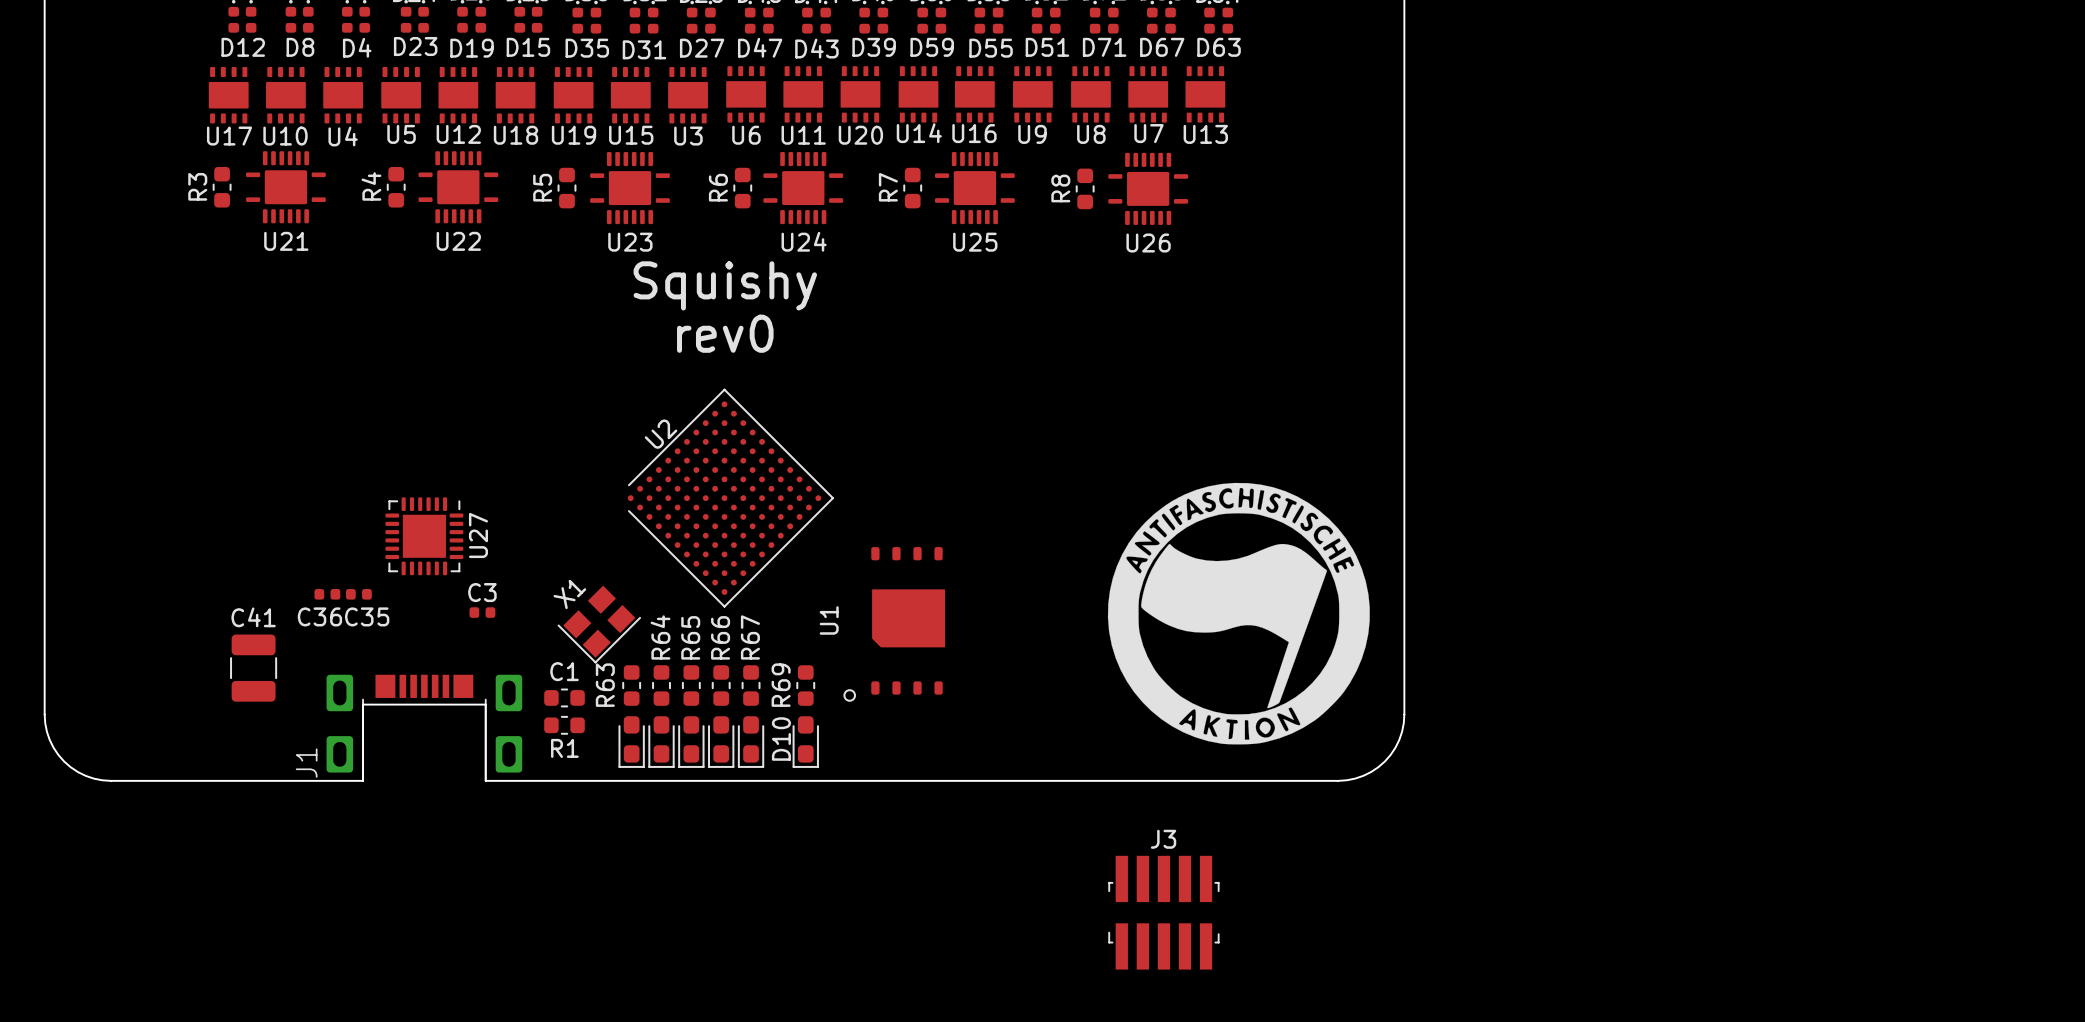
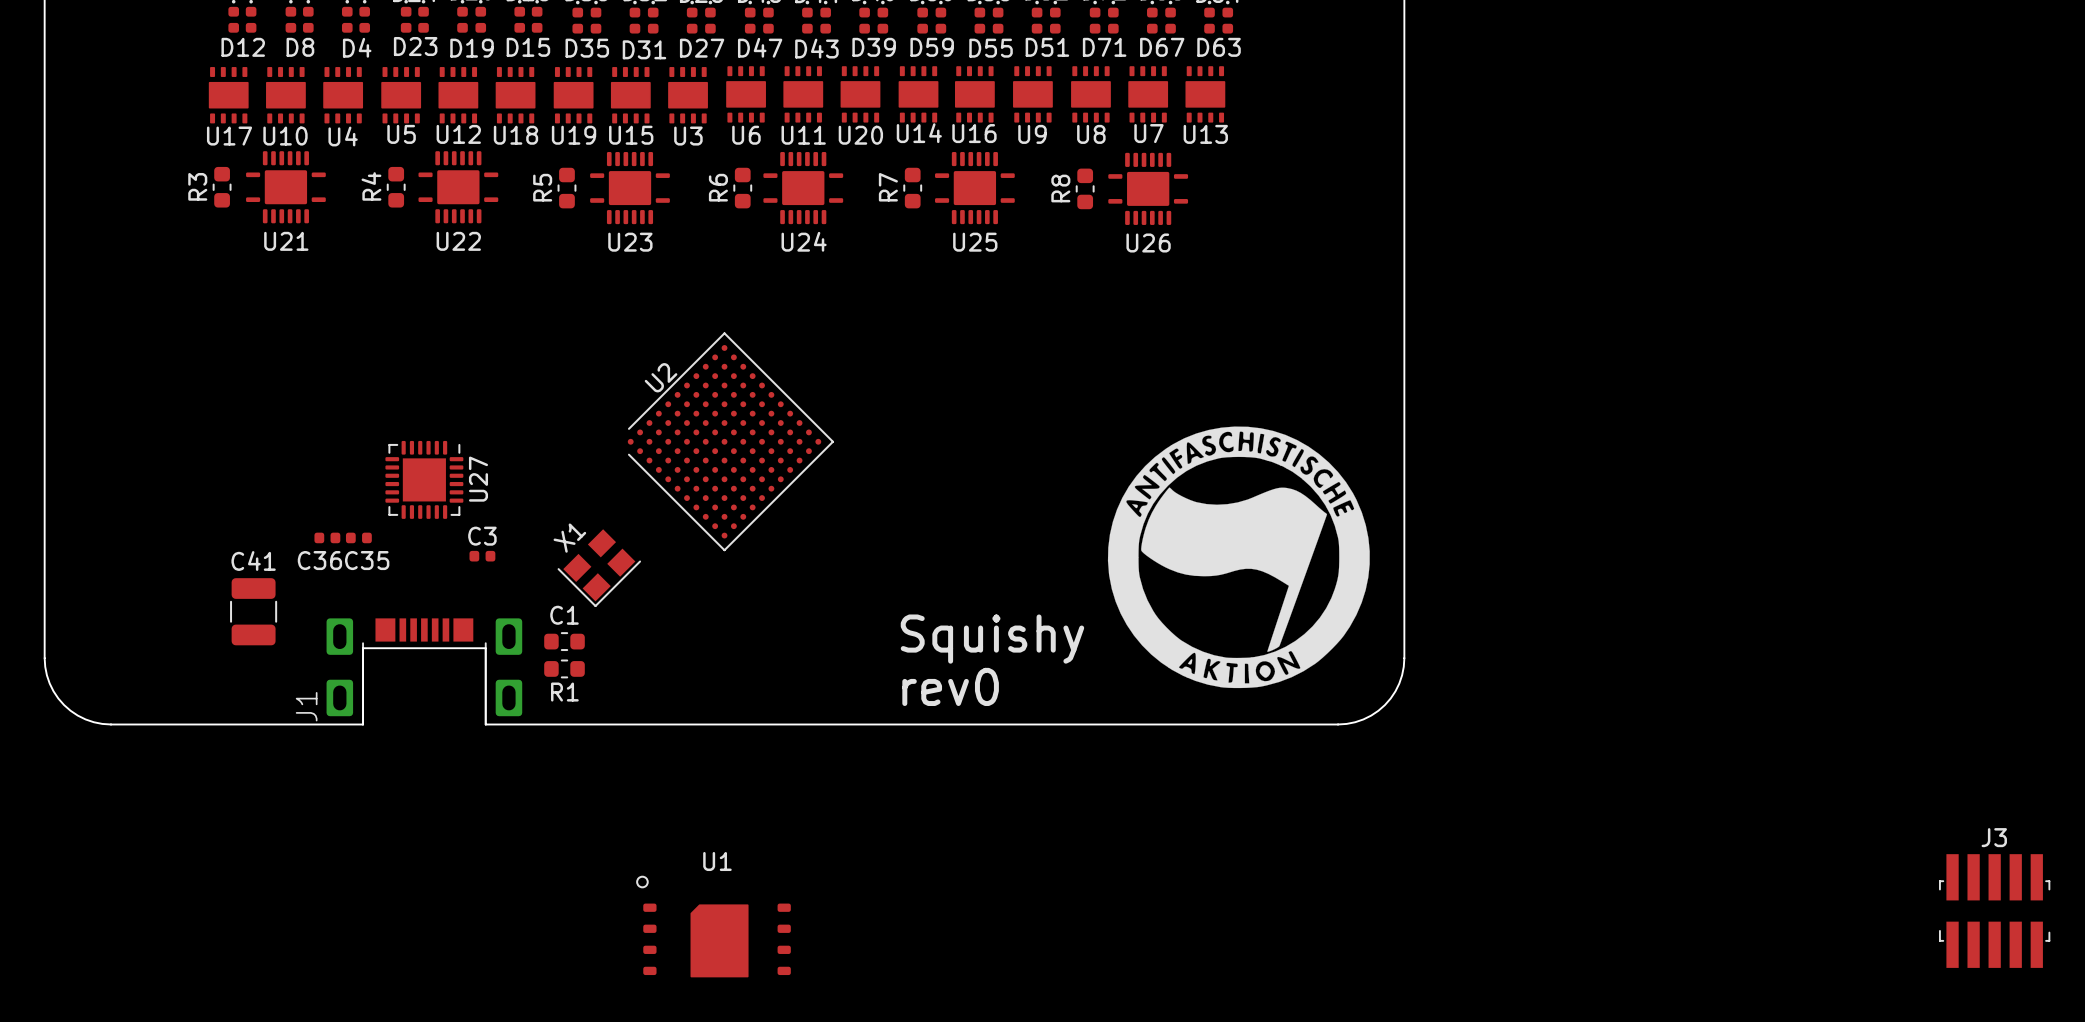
text position: Squishy (725, 285) -> Squishy (992, 639)
text position: rev0 (725, 333) -> rev0 (950, 686)
U2 position: (730, 498) -> (730, 441)
U27 position: (424, 536) -> (424, 479)
C36 position: (327, 594) -> (327, 537)
C35 position: (358, 594) -> (358, 537)
C3 position: (482, 612) -> (482, 556)
drawing position: (1238, 613) -> (1238, 557)
X1 position: (599, 624) -> (599, 568)
U1 rotation: 0° (894, 624) -> 90° clockwise (713, 926)
U1 position: (894, 624) -> (713, 926)
board edge: (44, 658) (44, 714) (49, 739) (64, 761) (85, 775) (110, 780) (363, 780) -> (44, 658) (46, 675) (58, 698) (70, 710) (93, 722) (110, 724) (363, 724)
board edge: (1404, 658) (1404, 714) (1399, 739) (1390, 754) (1378, 767) (1363, 775) (1346, 780) (485, 780) -> (1404, 658) (1399, 683) (1384, 705) (1363, 719) (1346, 723) (485, 724)
C41 position: (253, 668) -> (253, 611)
R63: (631, 685) -> none
R64: (661, 685) -> none
R65: (691, 685) -> none
R66: (721, 685) -> none
R67: (751, 685) -> none
R69: (805, 685) -> none
C1 position: (564, 697) -> (564, 641)
R1 position: (564, 725) -> (564, 668)
J1 position: (424, 728) -> (424, 671)
part: (631, 742) -> none
part: (661, 742) -> none
part: (691, 742) -> none
part: (721, 742) -> none
part: (751, 742) -> none
D10: (805, 742) -> none
J3 position: (1163, 912) -> (1994, 911)

